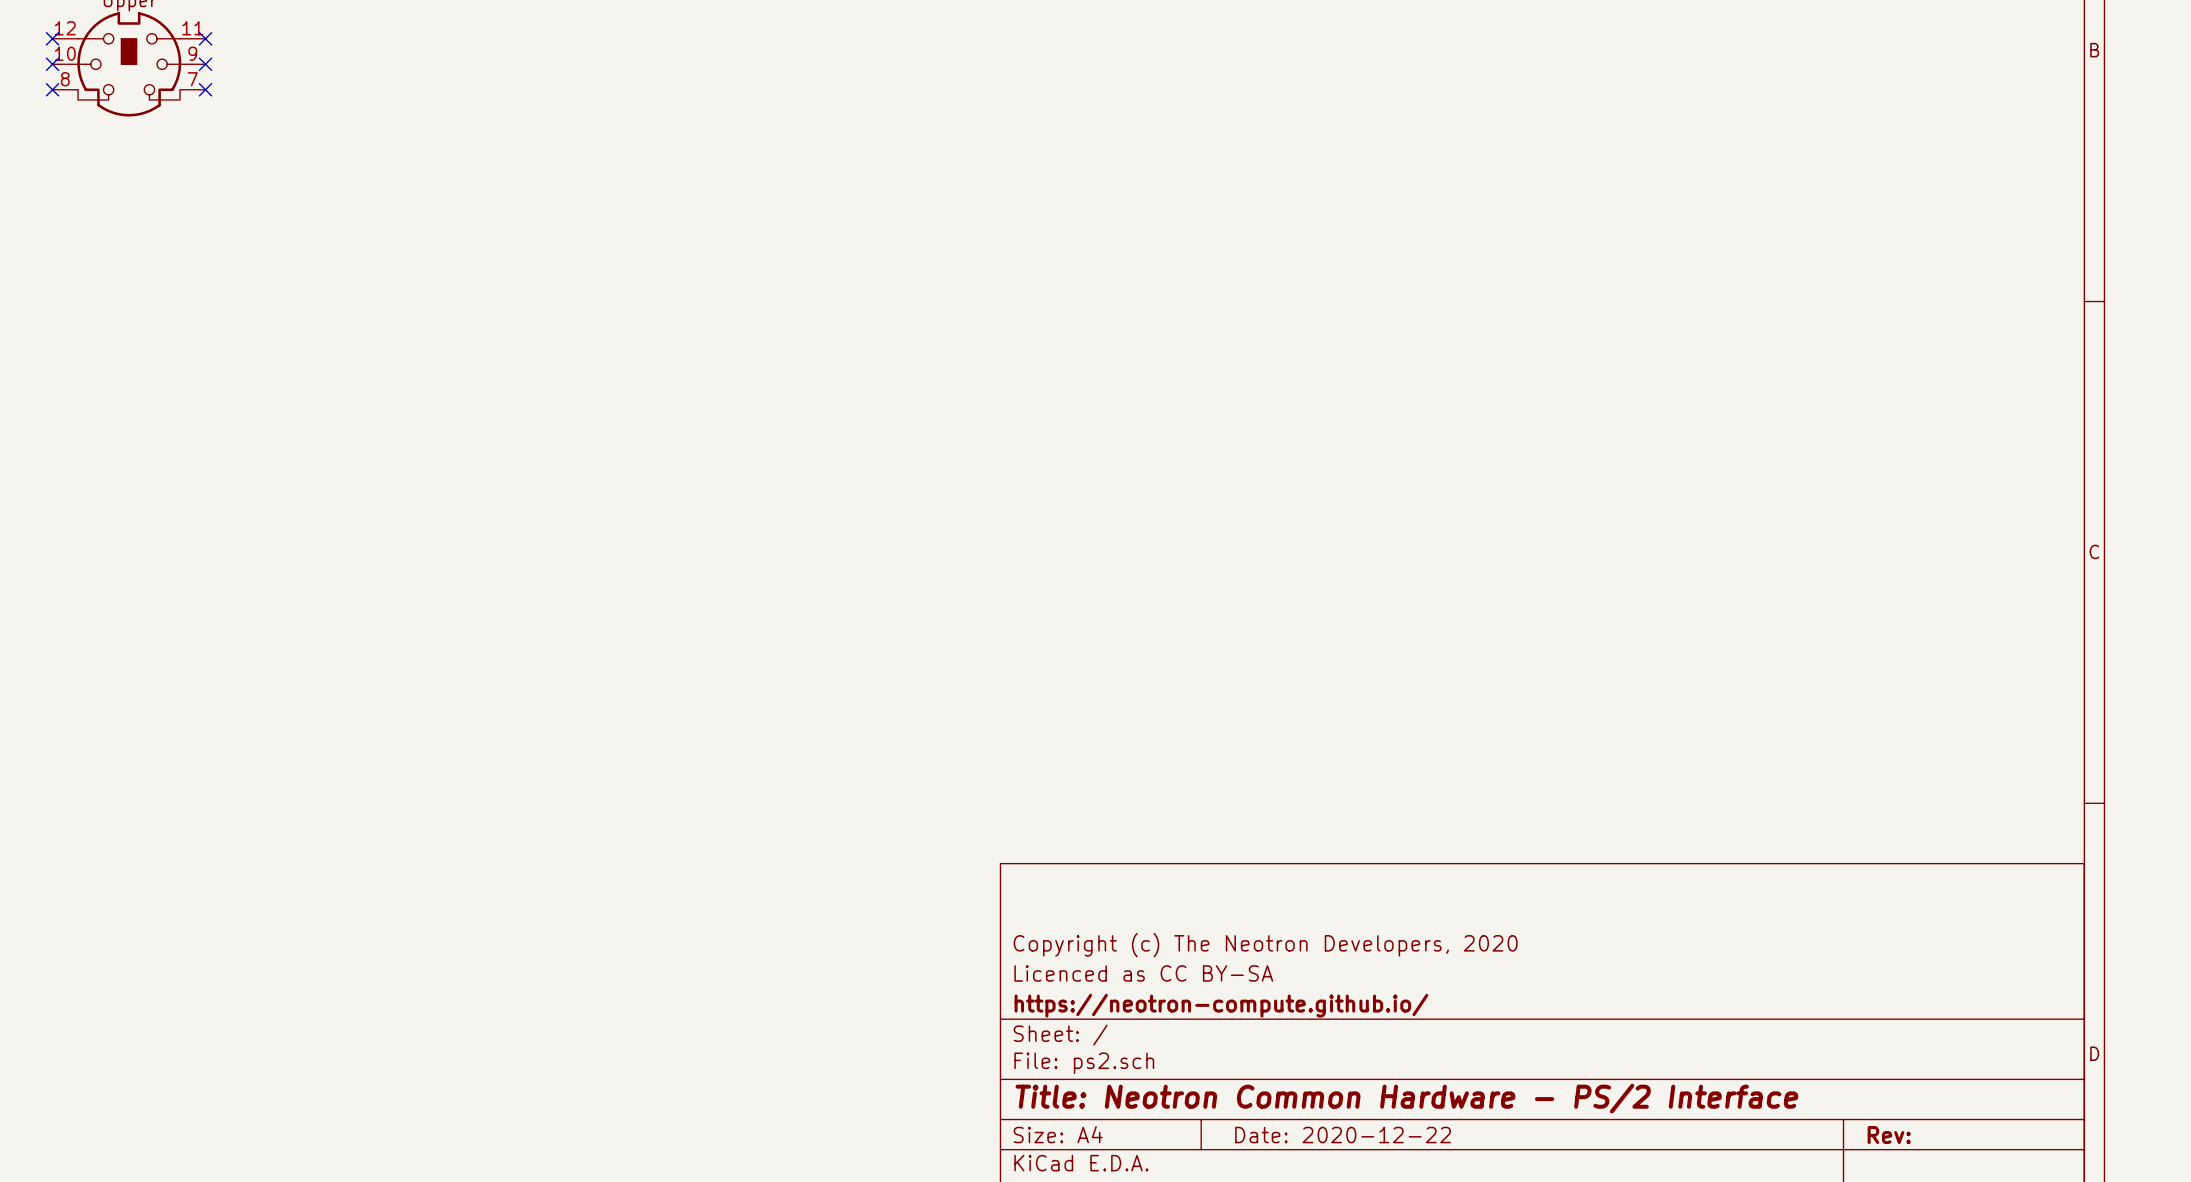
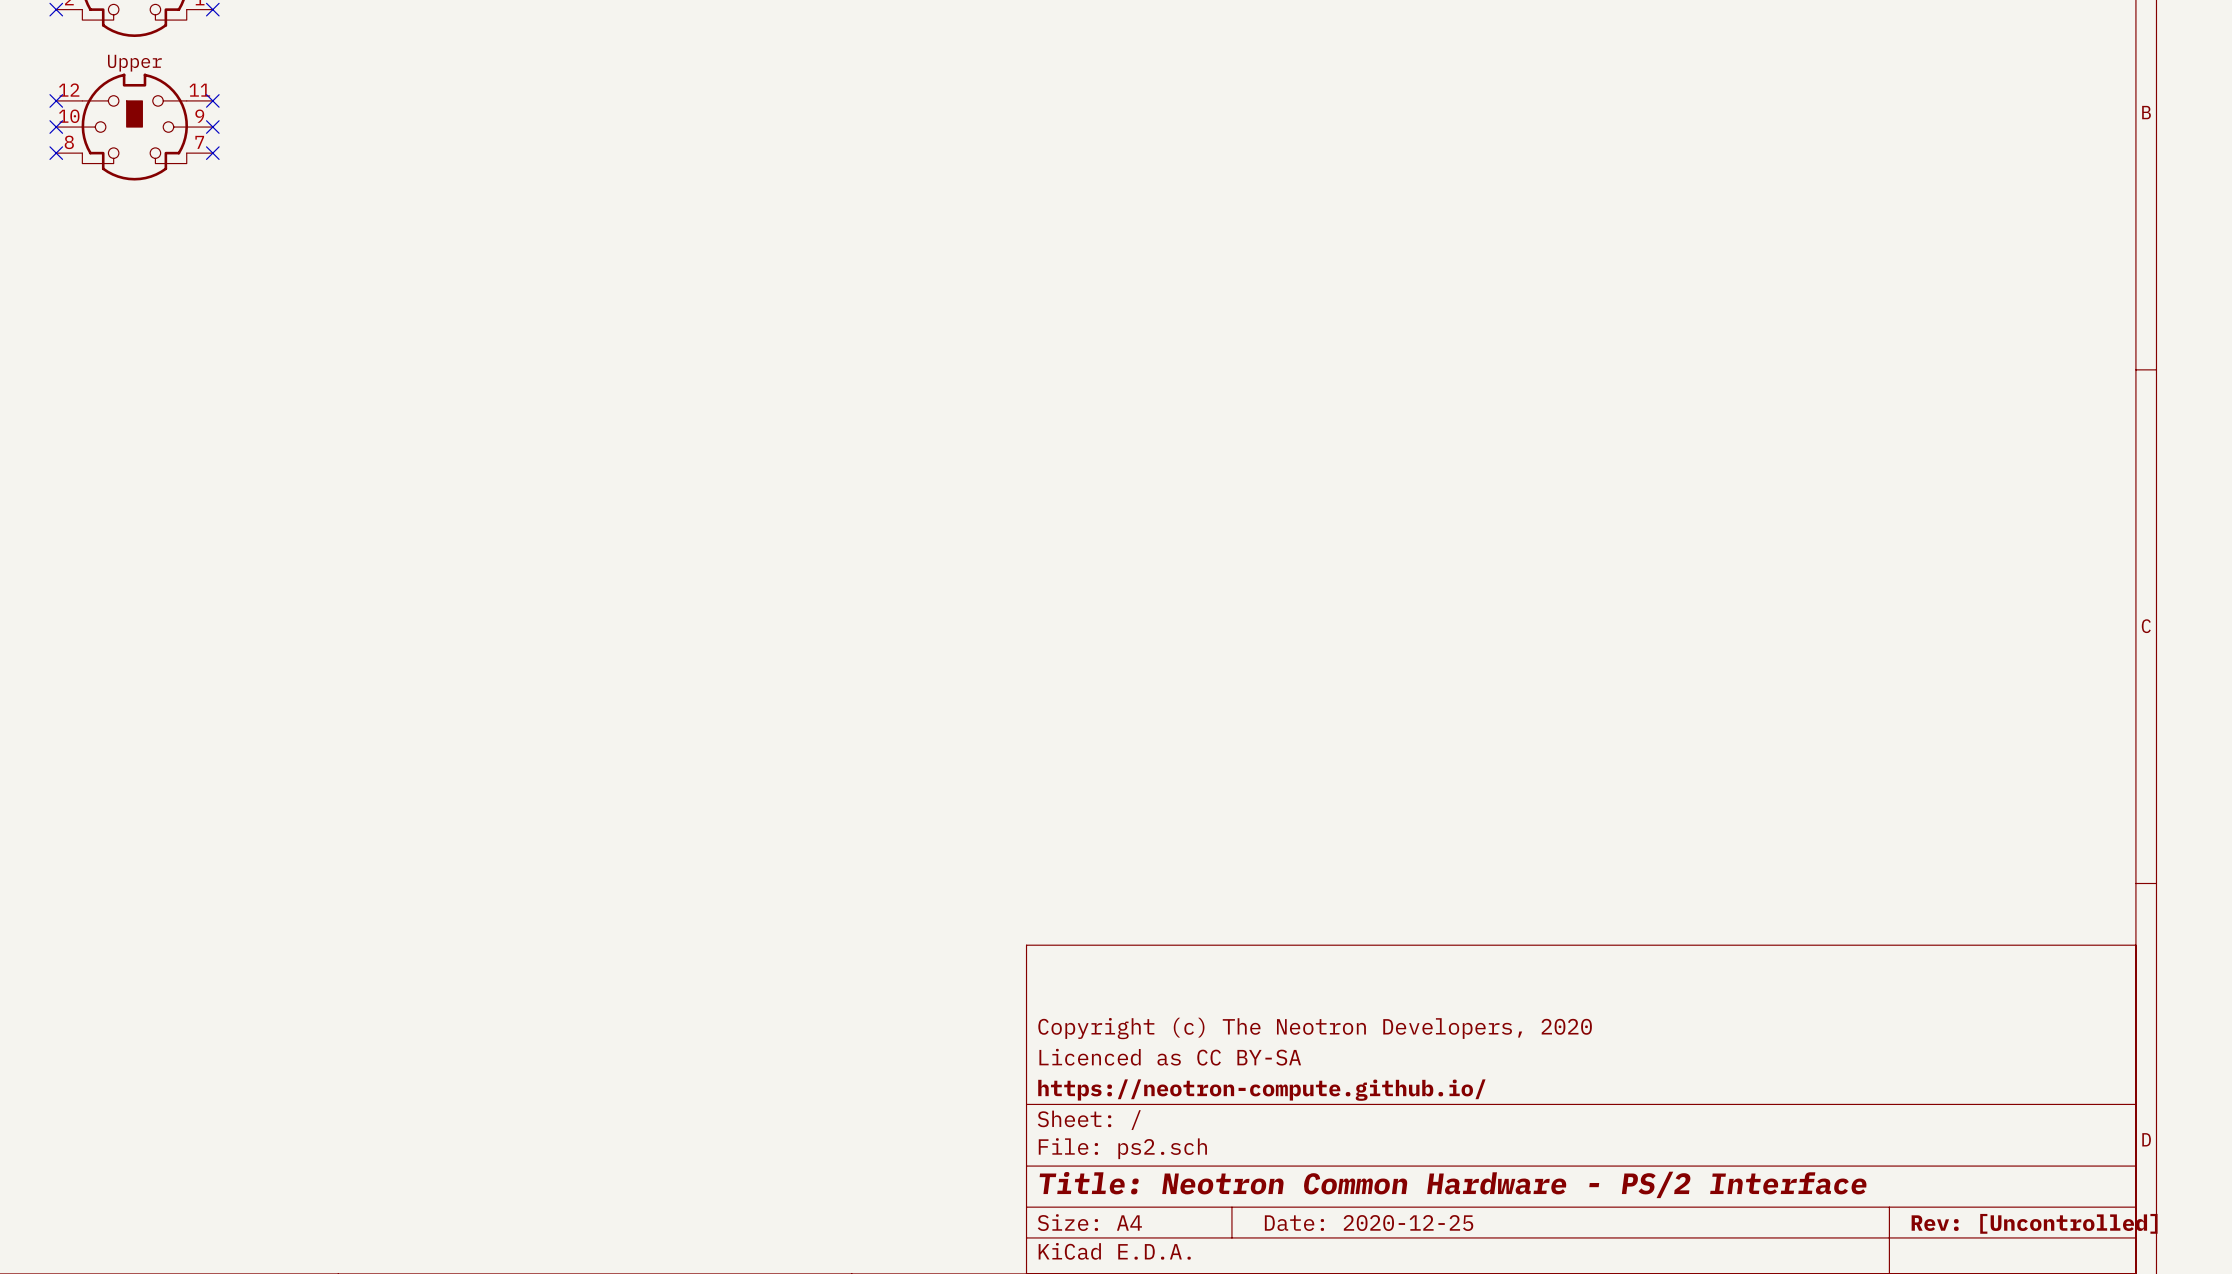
title block: Date: 2020-12-22 (1343, 1135) -> Date: 2020-12-25 (1369, 1223)
title block: Rev: (1889, 1135) -> Rev: [Uncontrolled] (2034, 1223)

